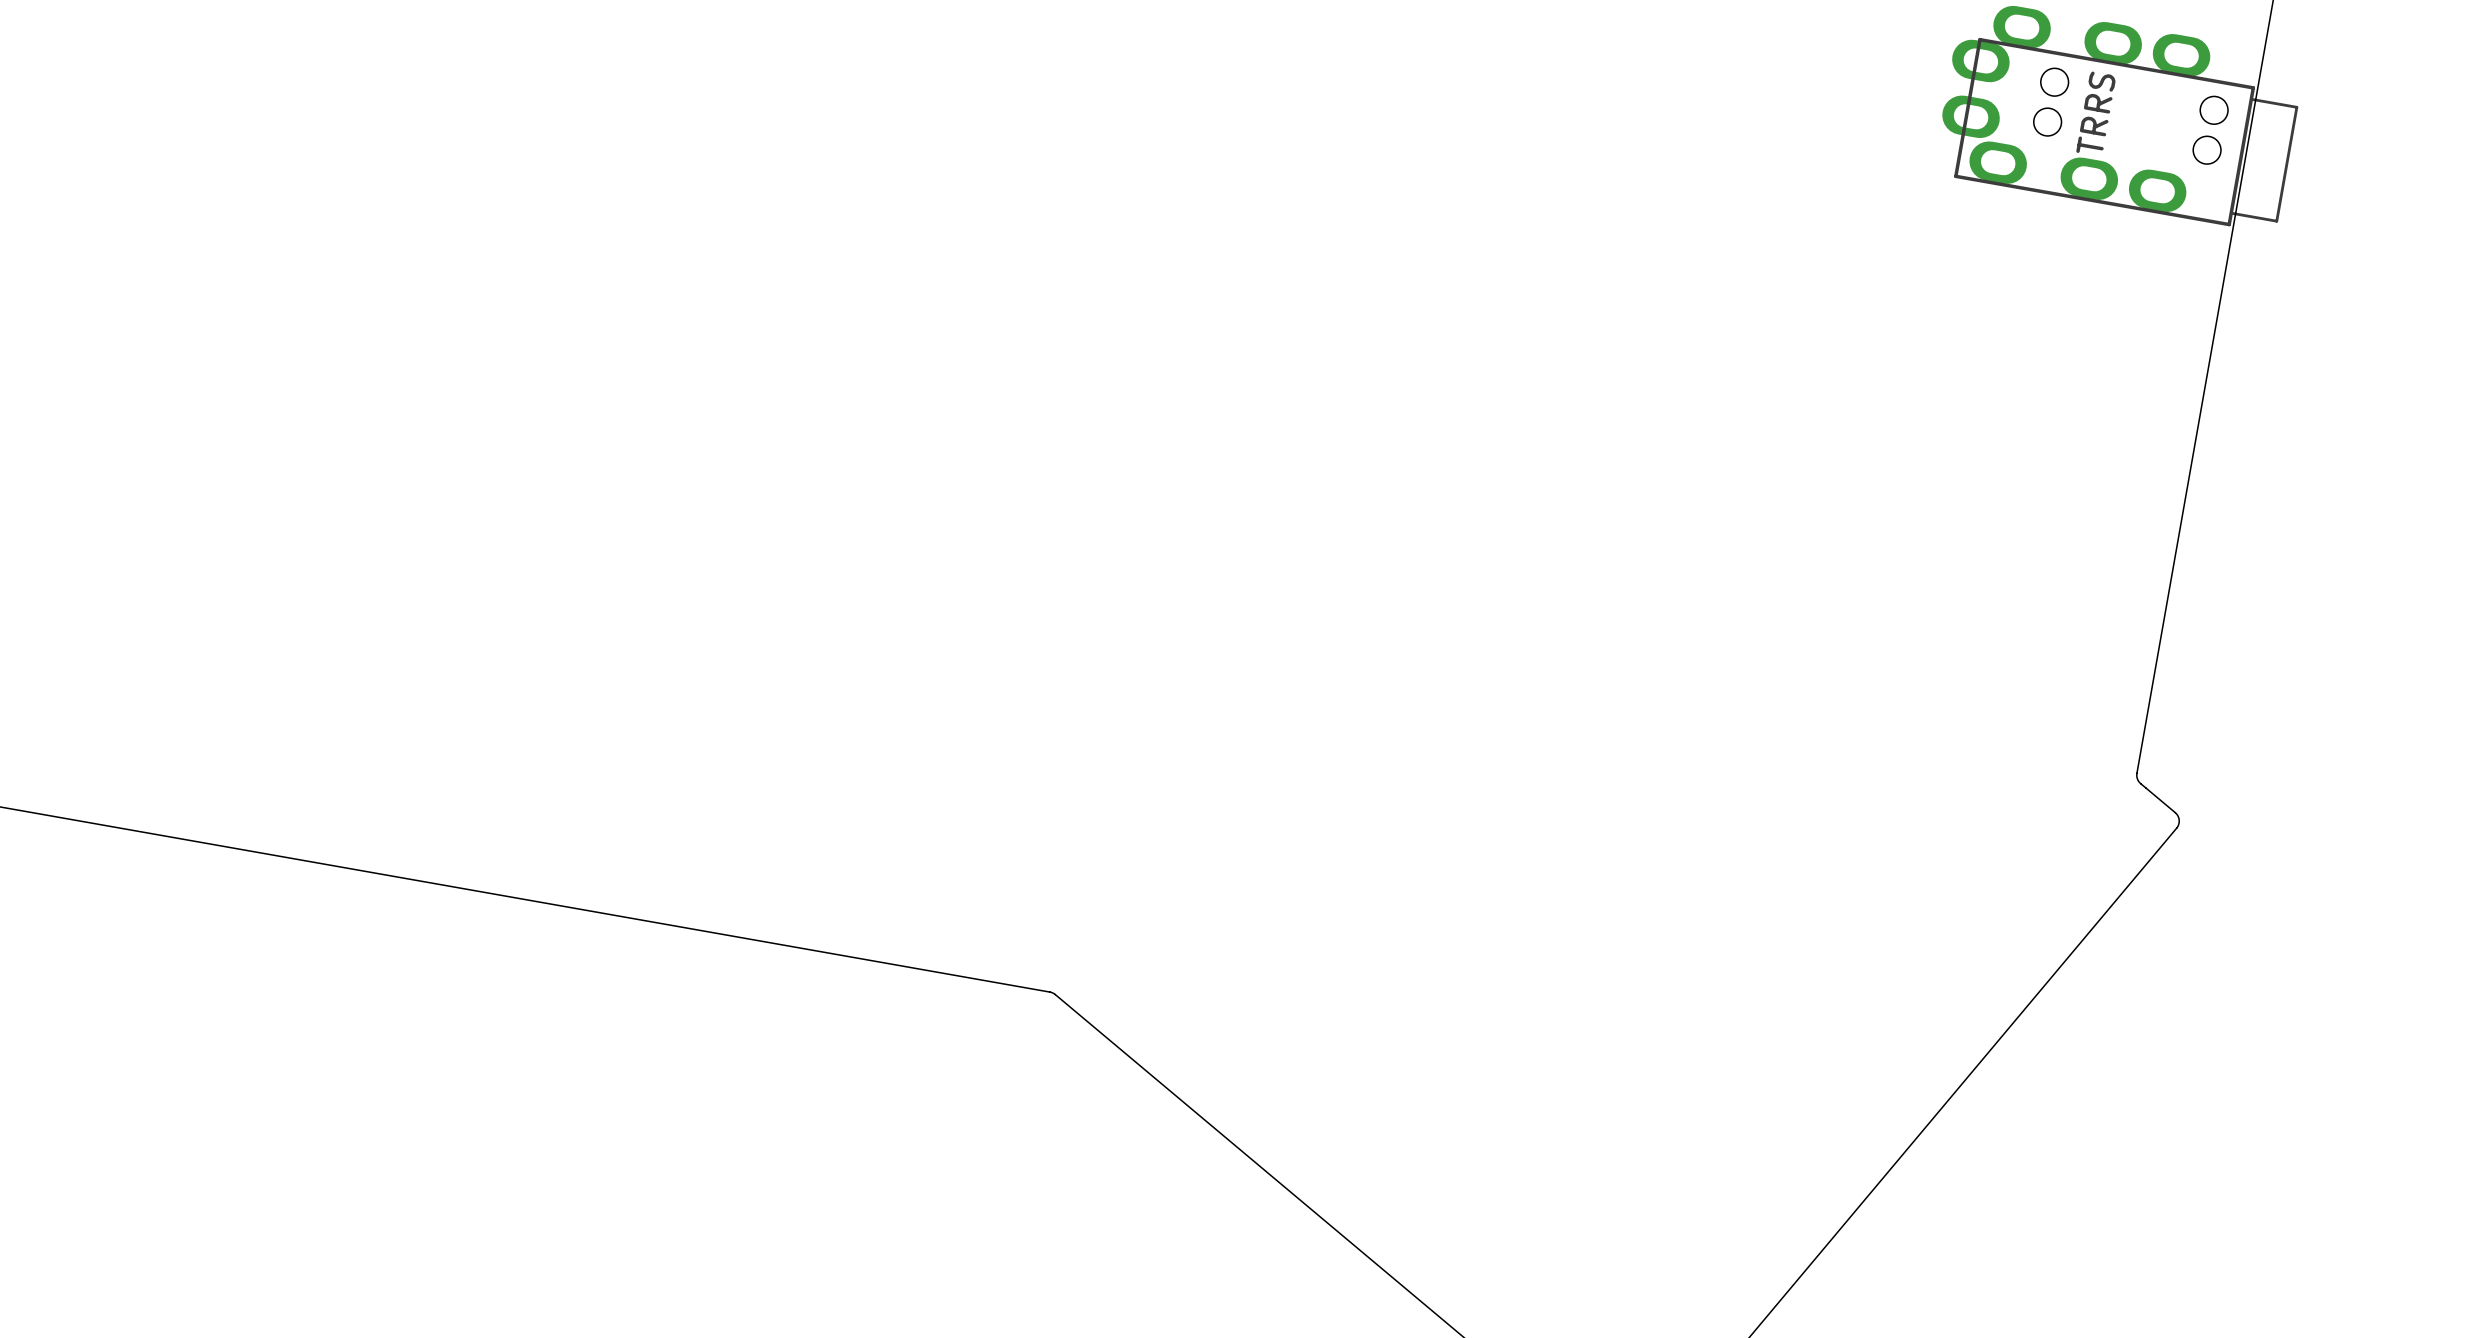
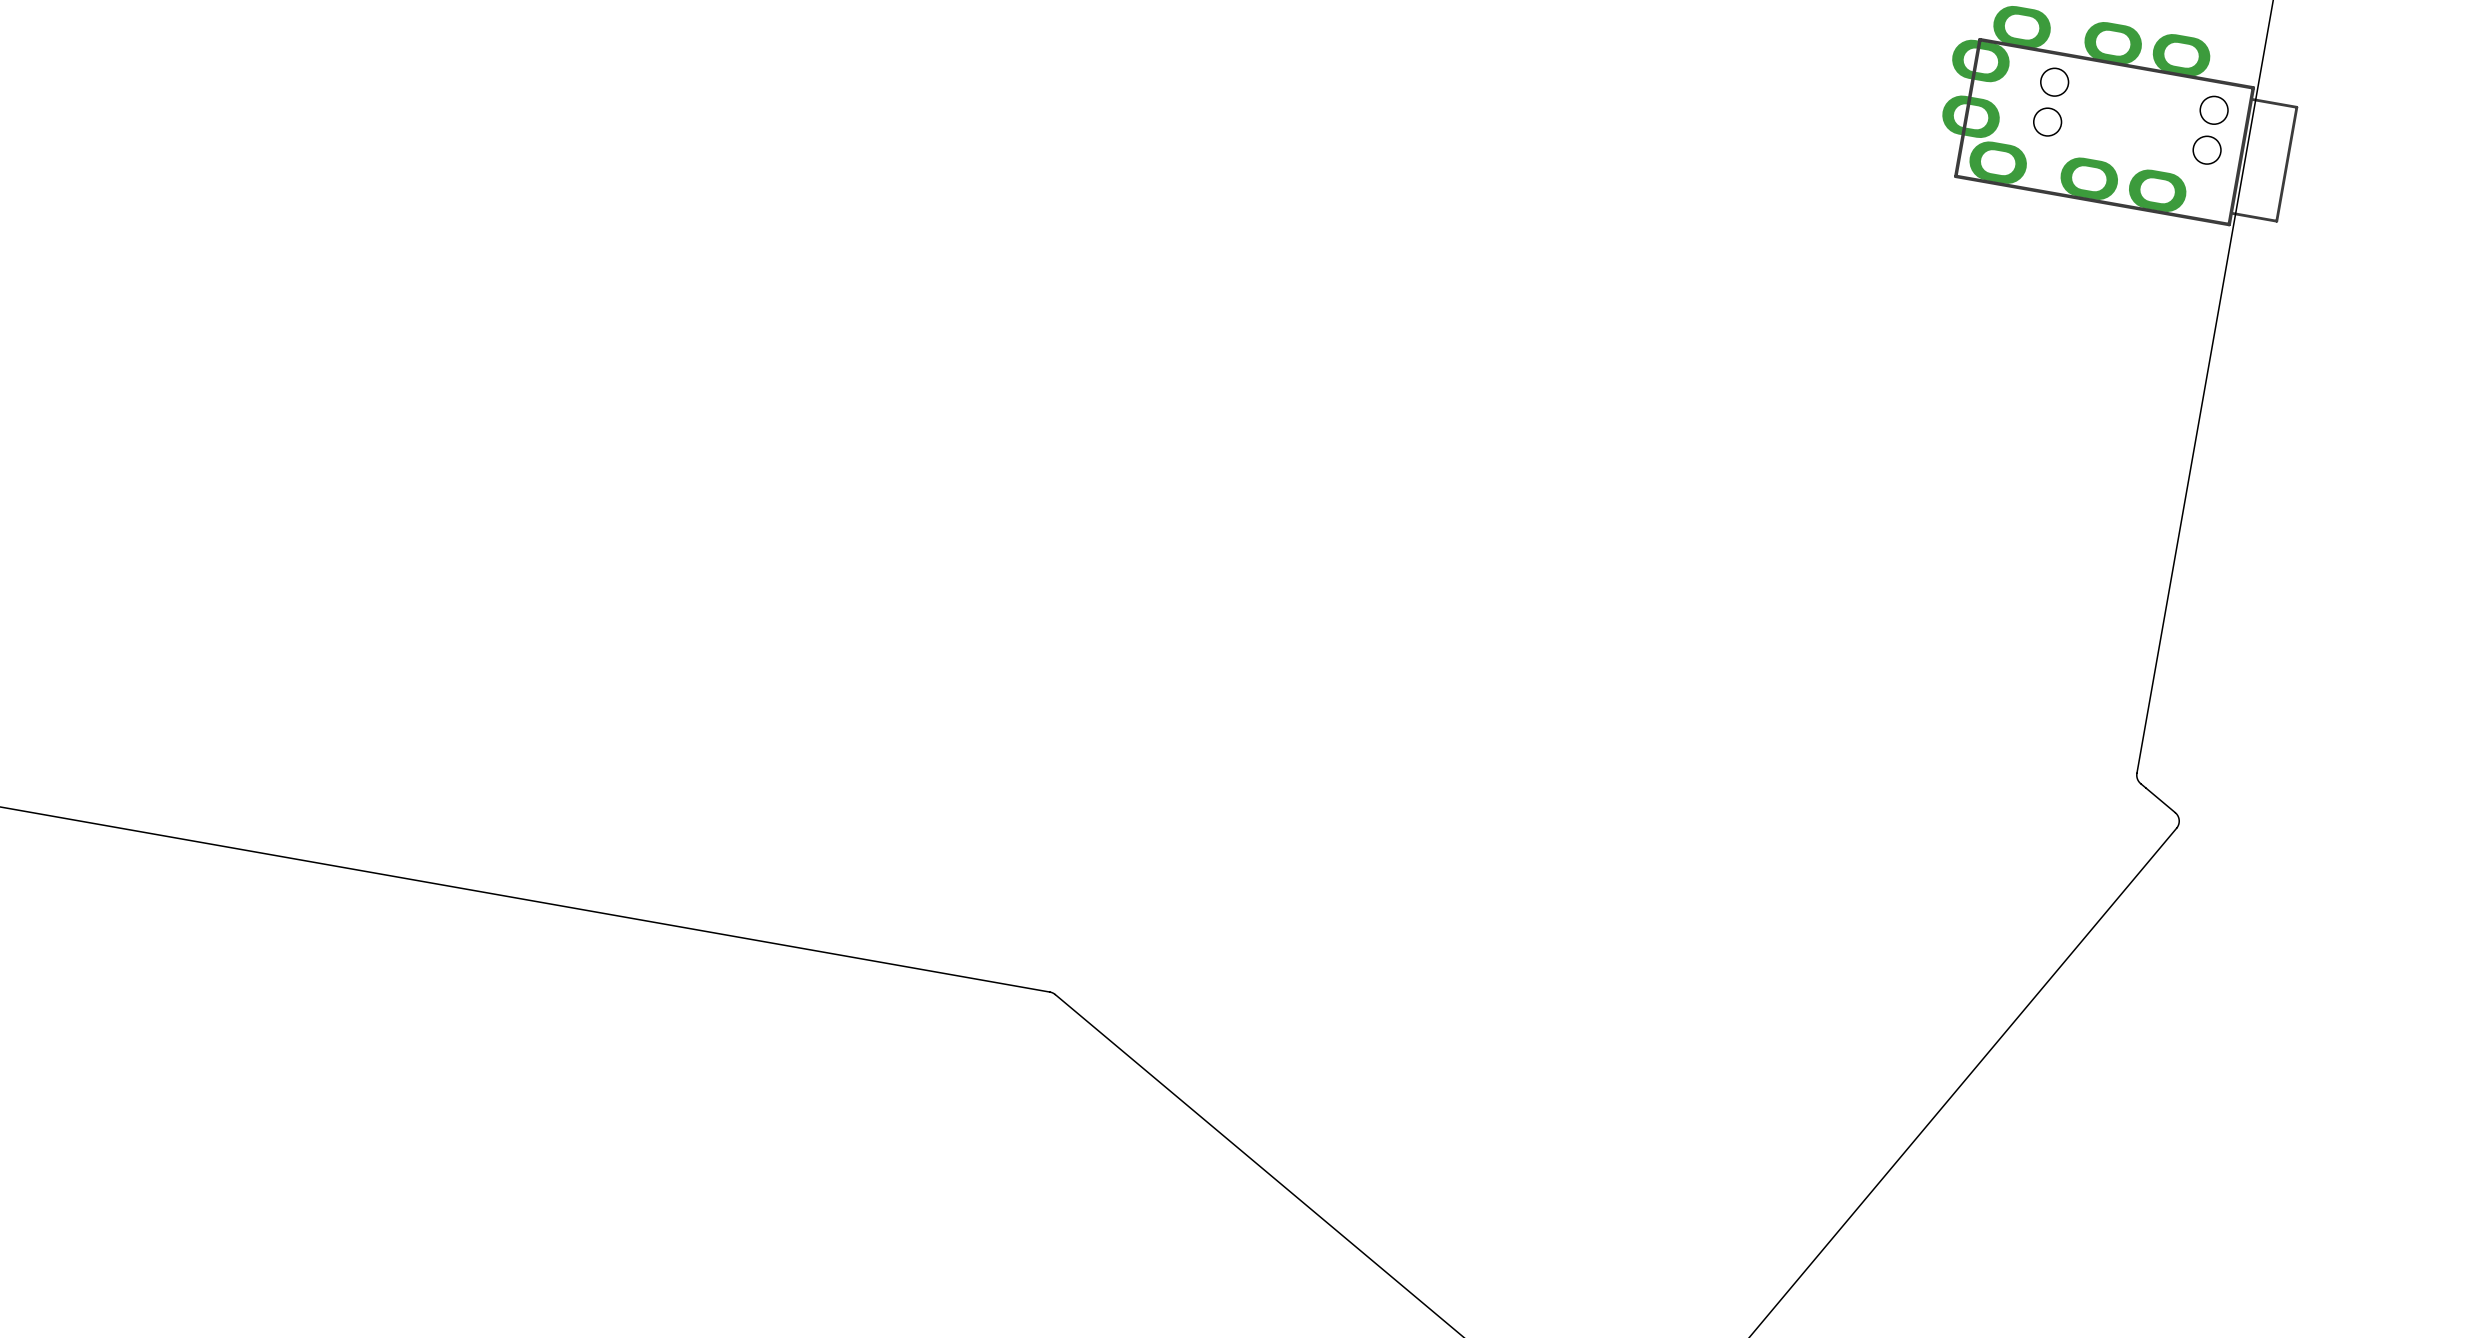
part text: TRRS (2095, 112) -> none

